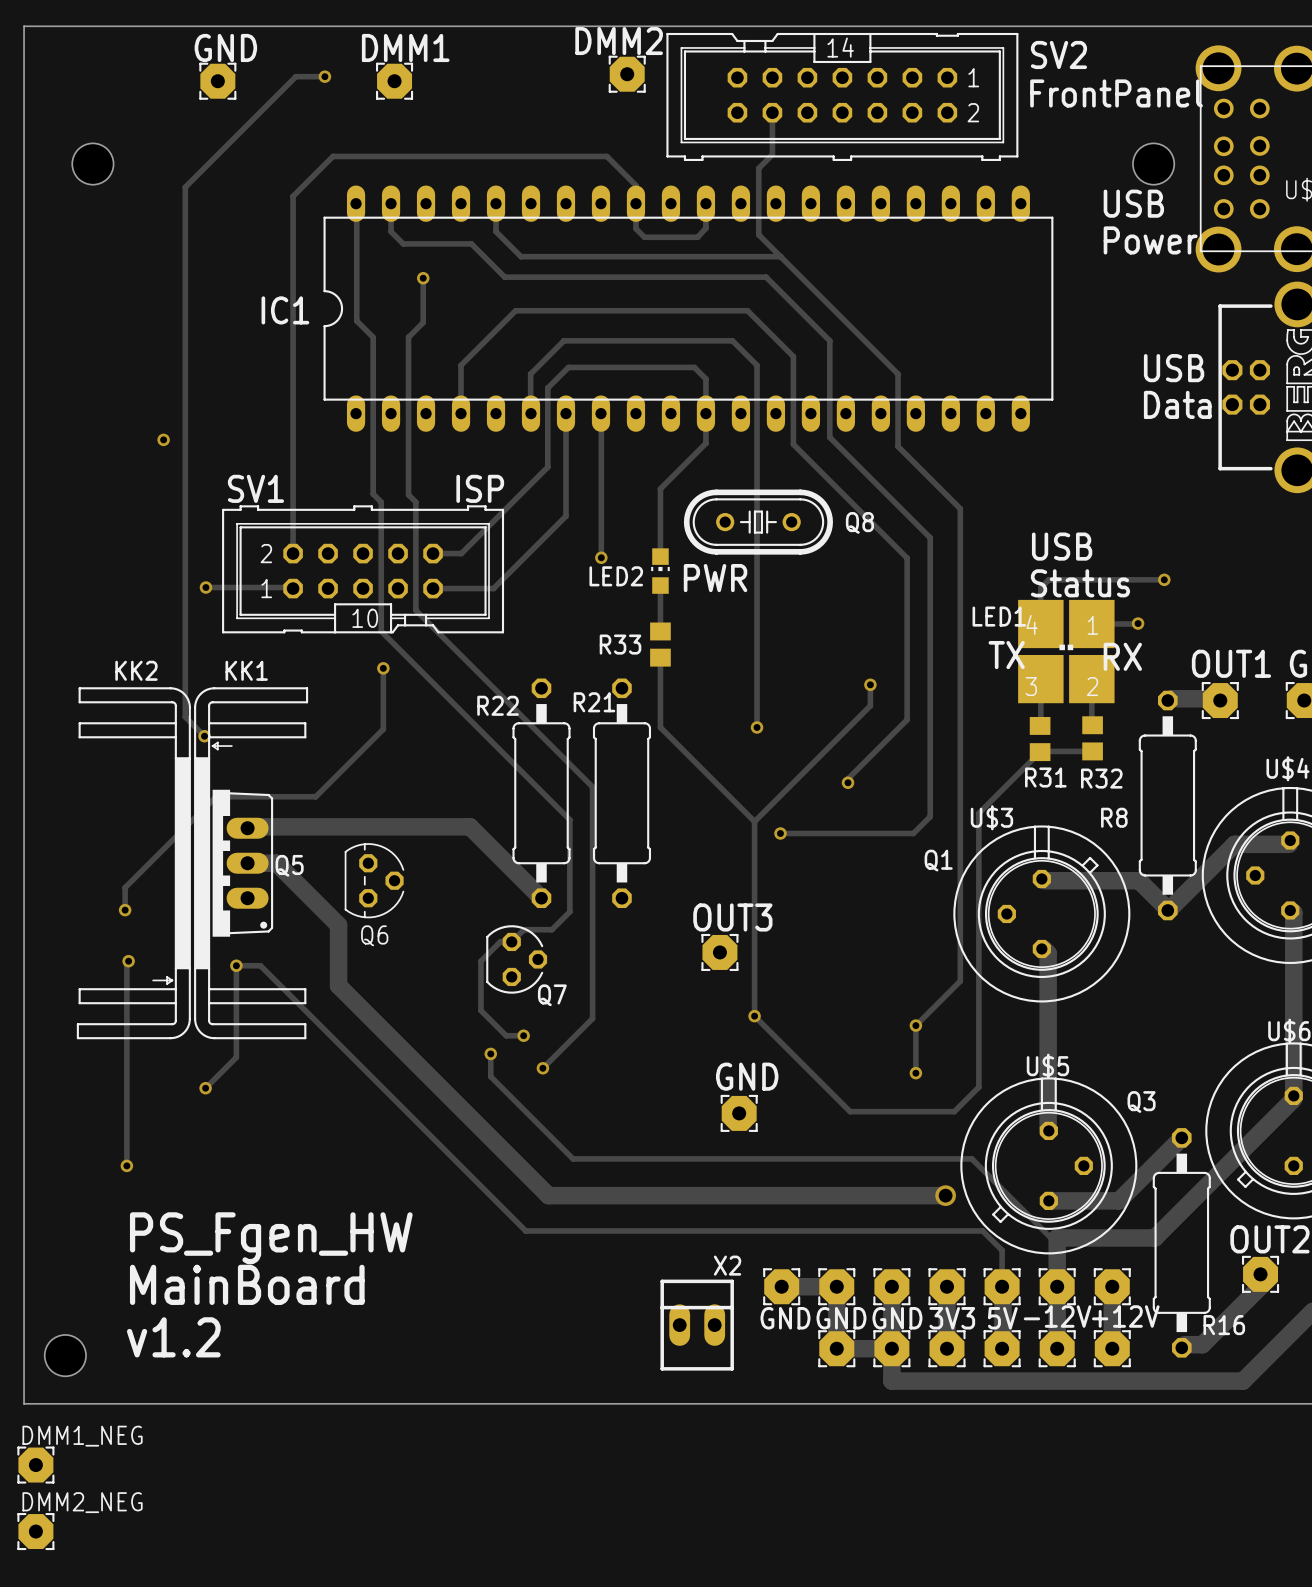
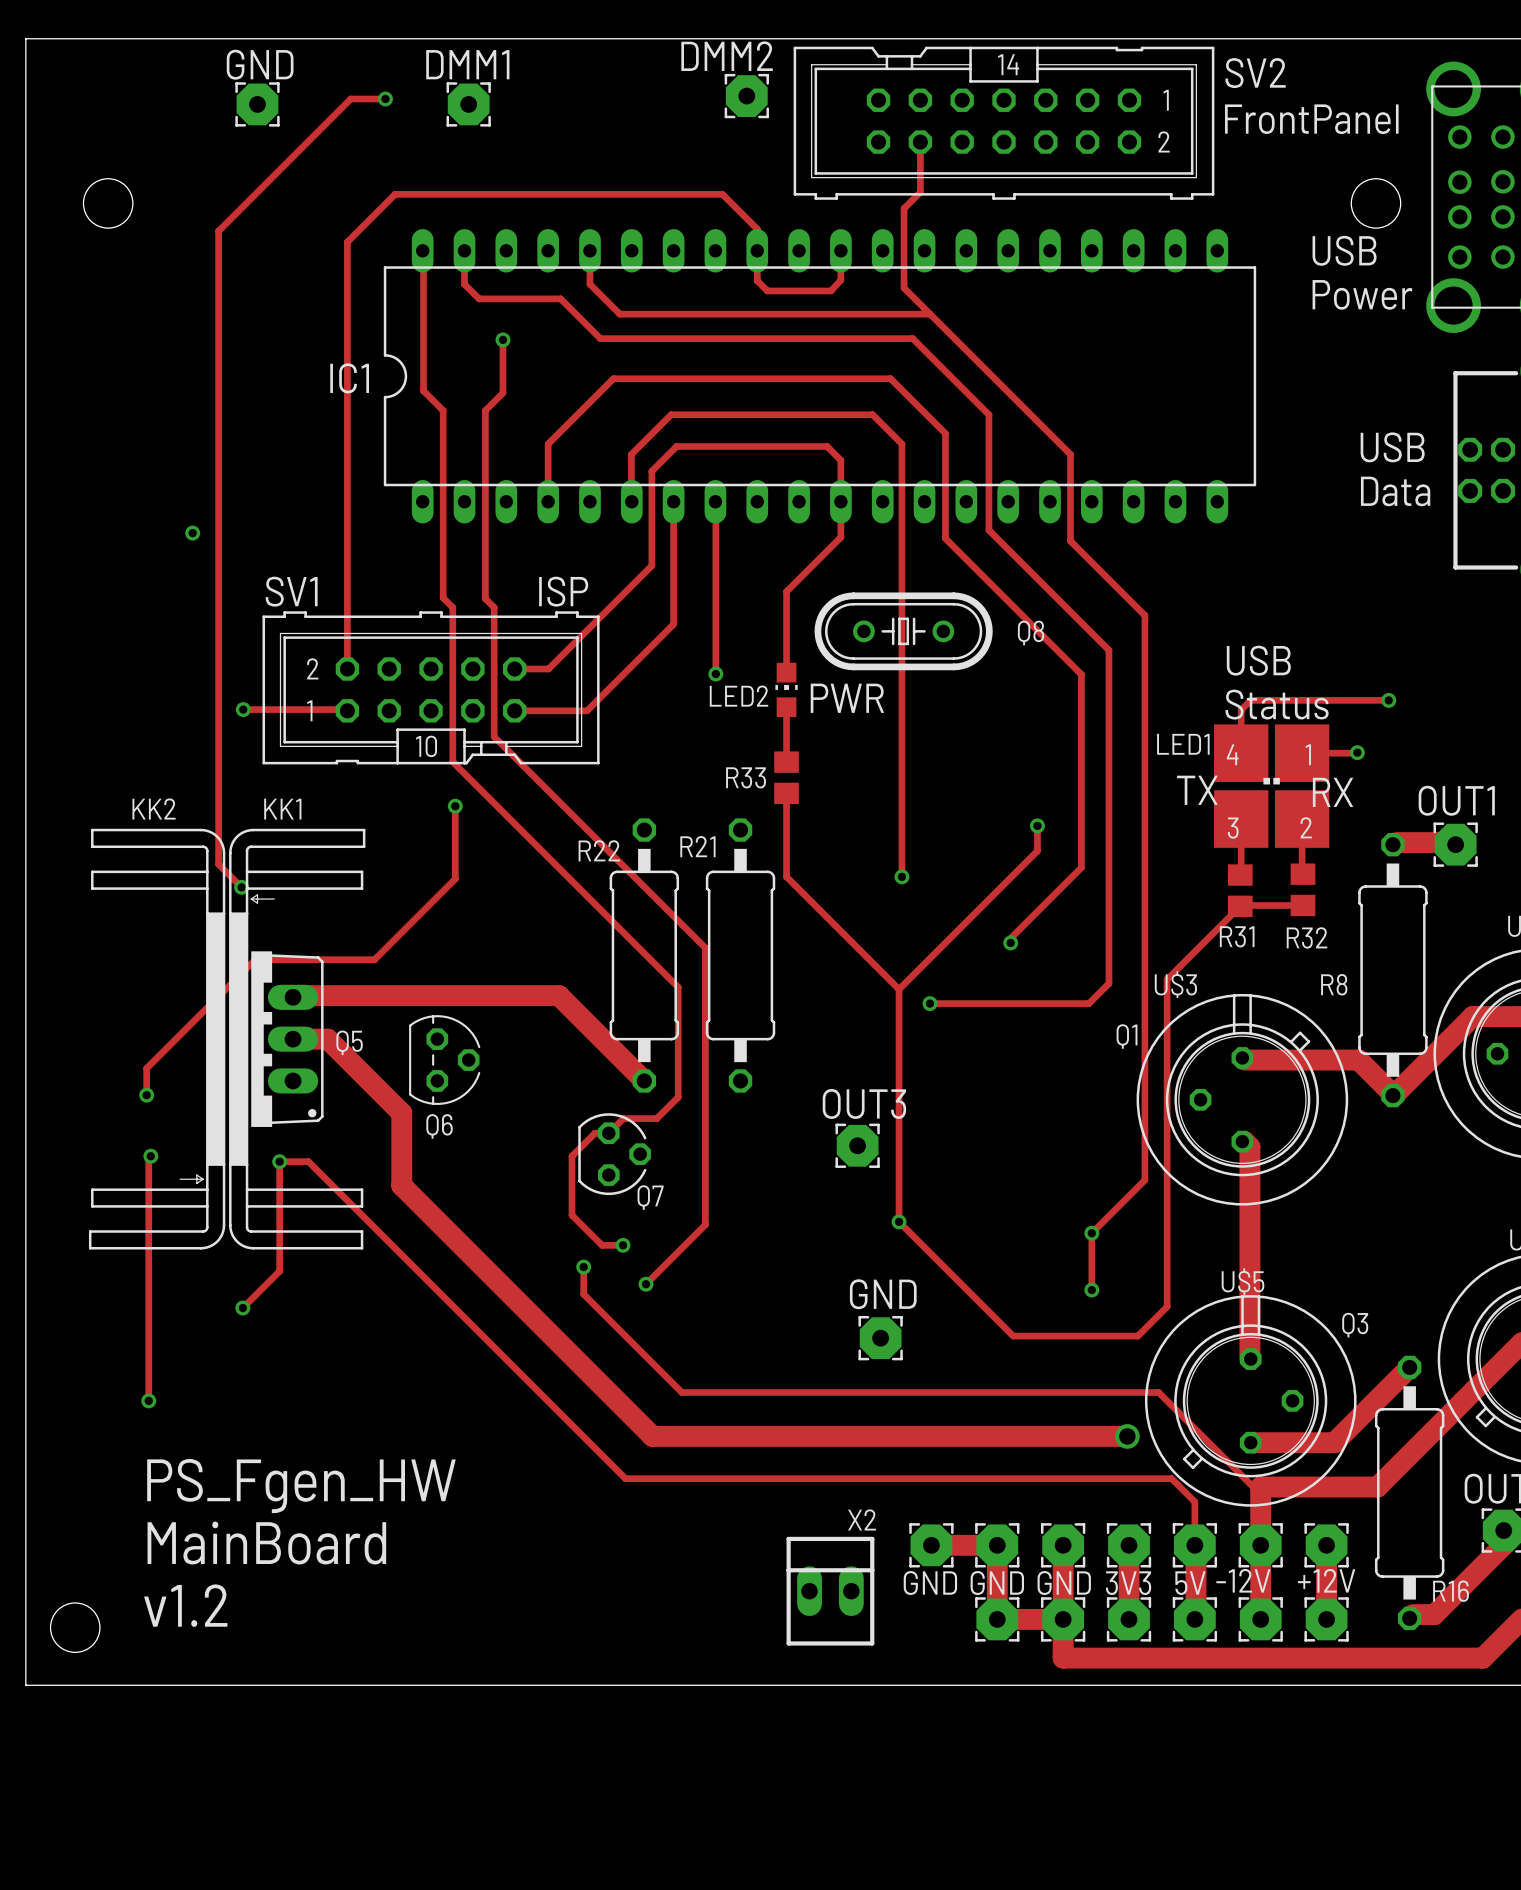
DMM1_NEG: (35, 1465) -> none
DMM2_NEG: (35, 1531) -> none

